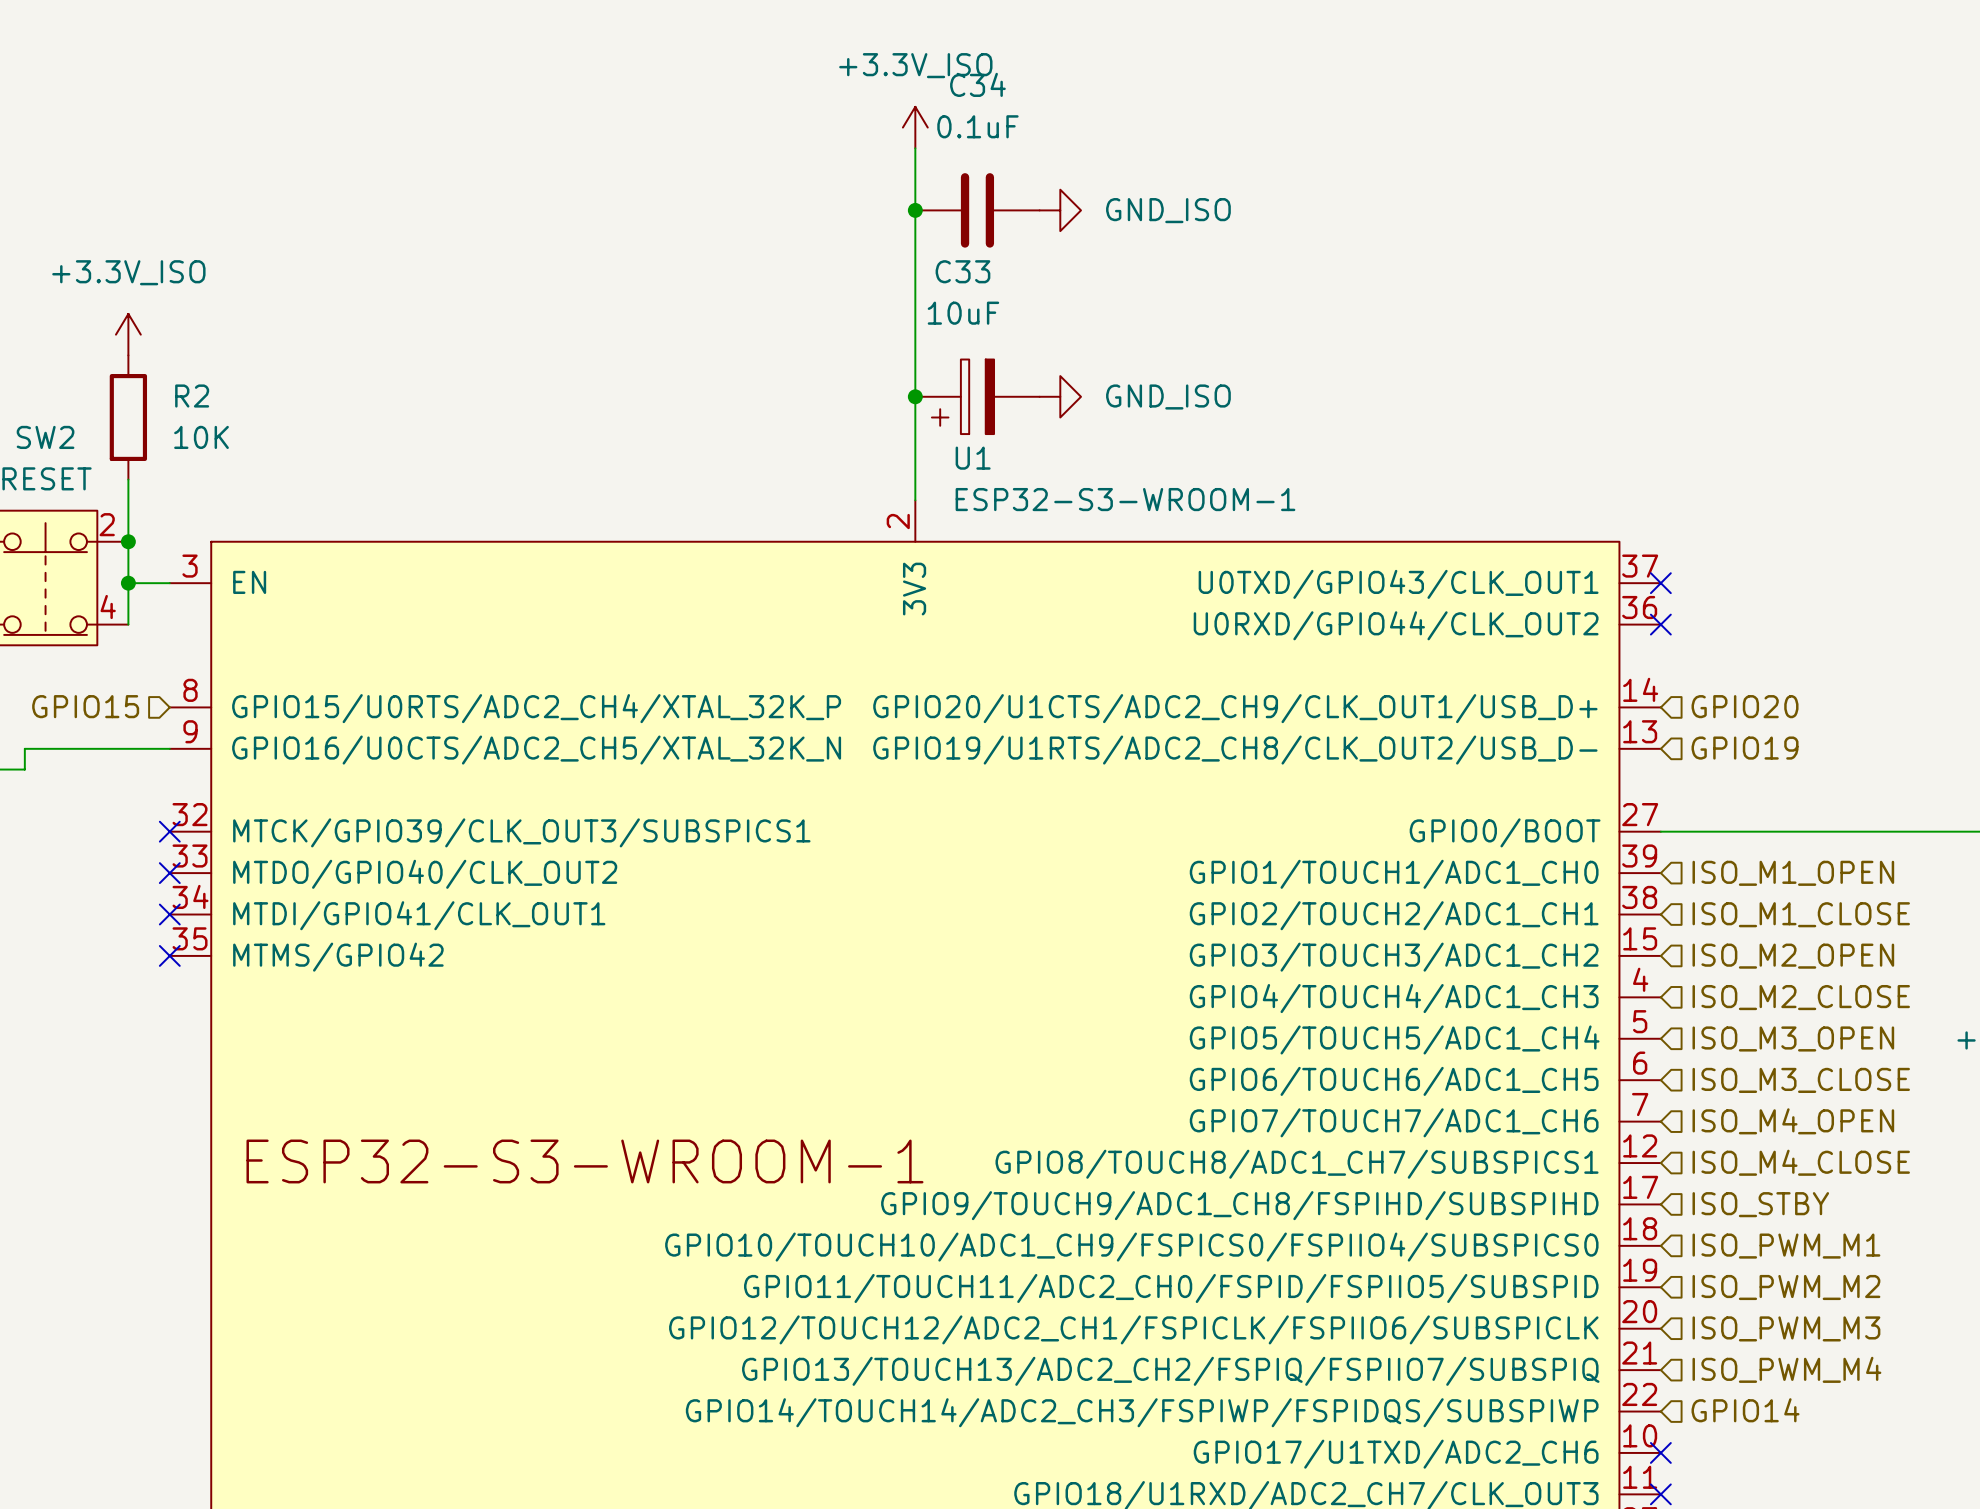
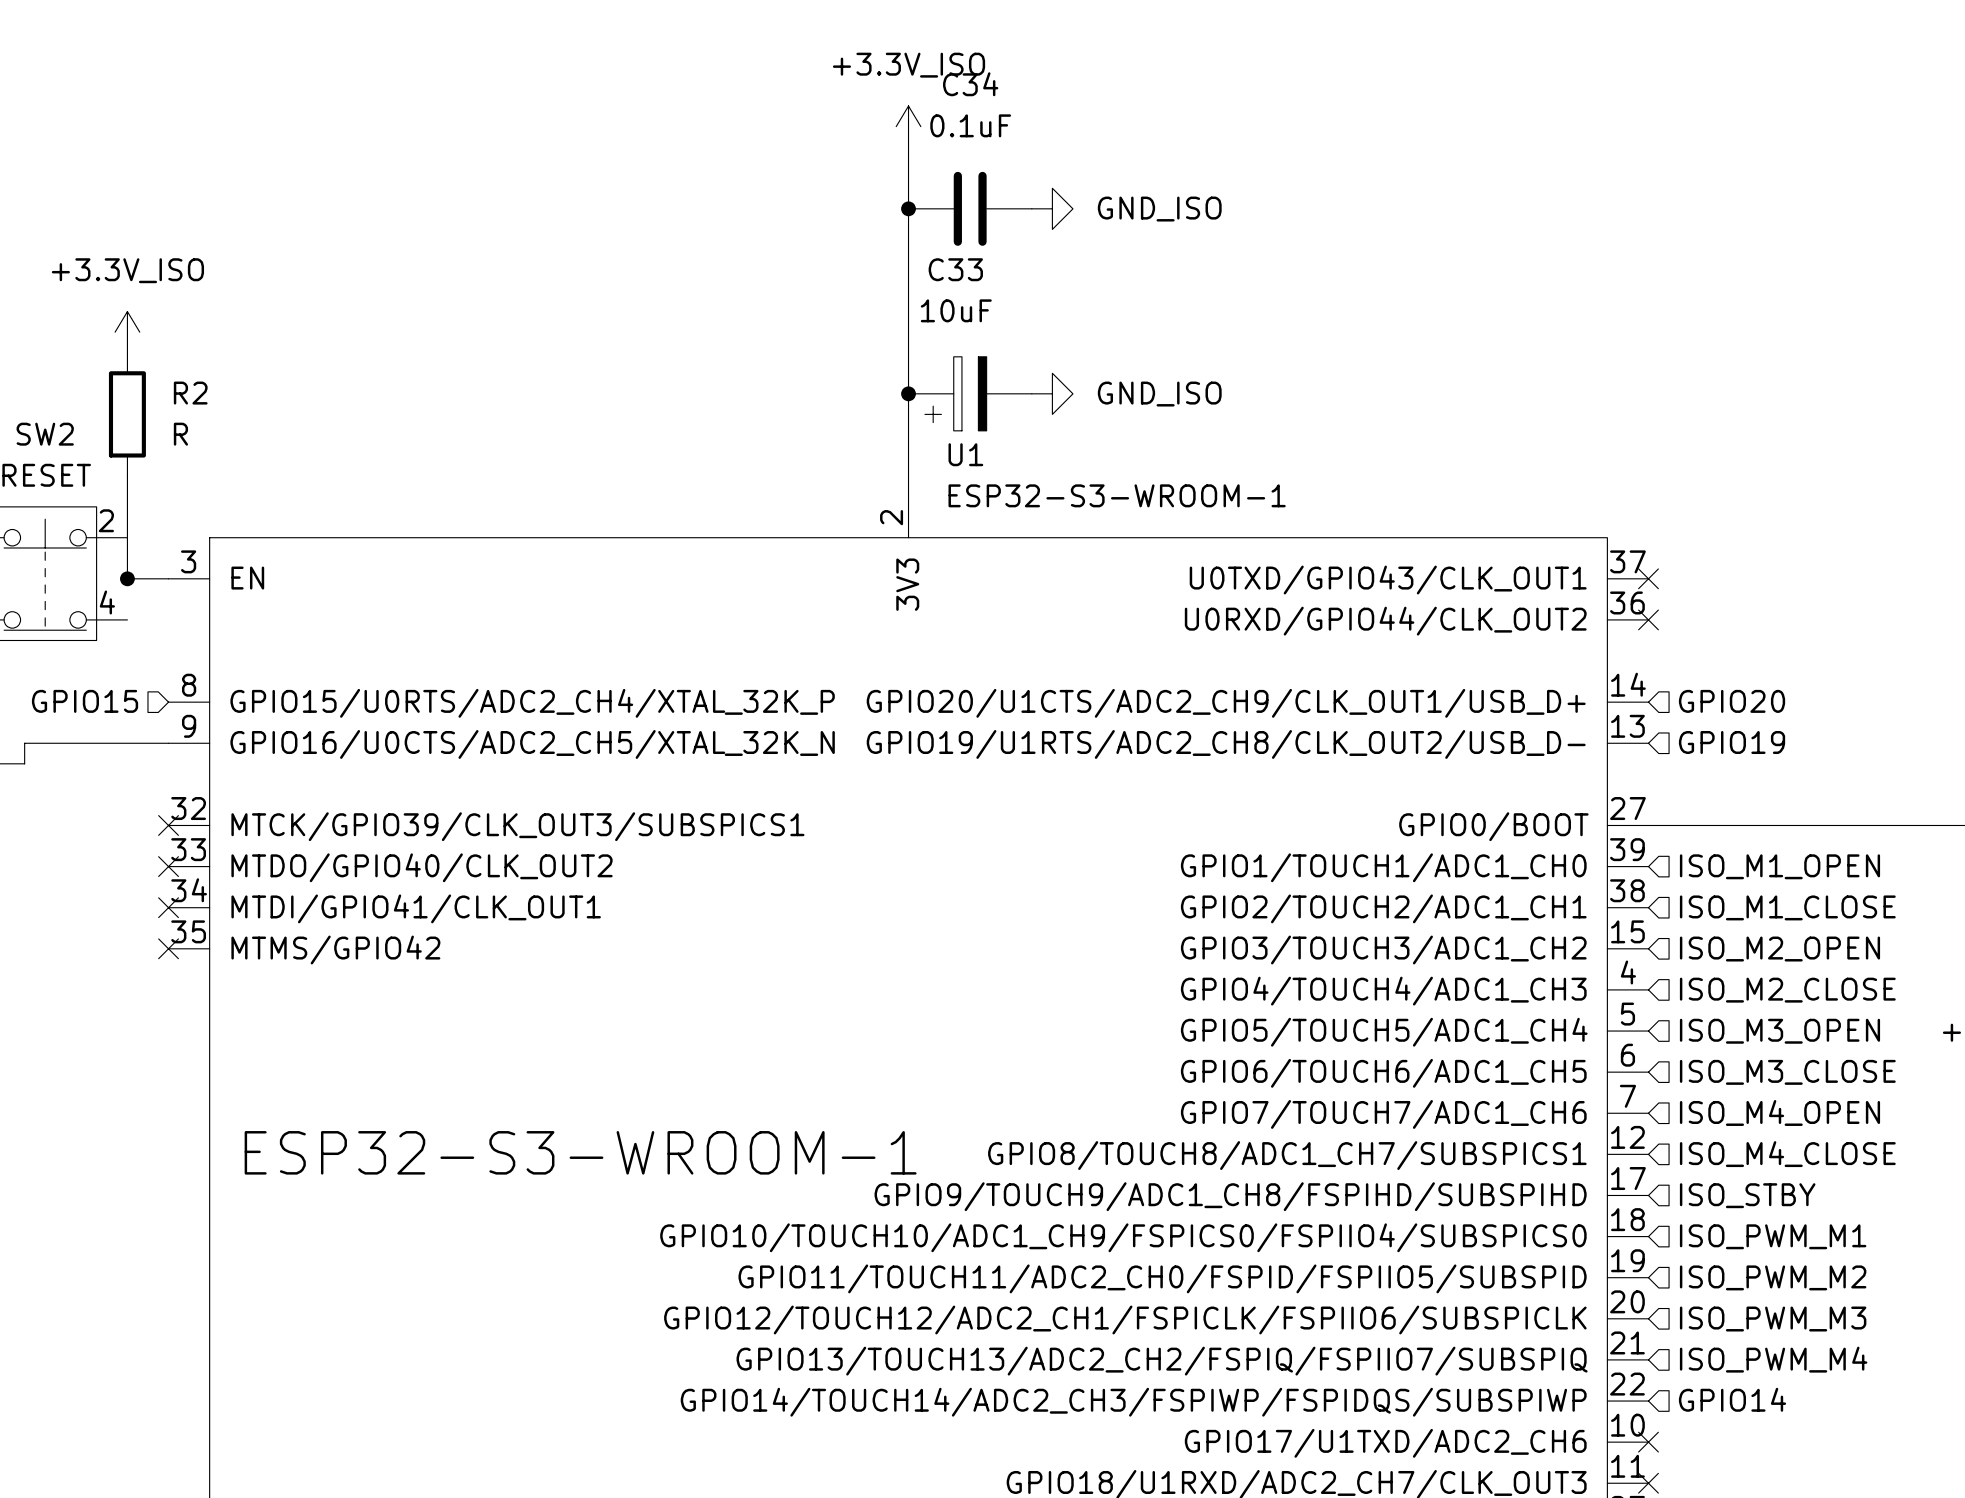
R2 value: 10K (201, 437) -> R (180, 434)
junction: (128, 541) -> none
wire: (128, 583) (128, 624) -> none

